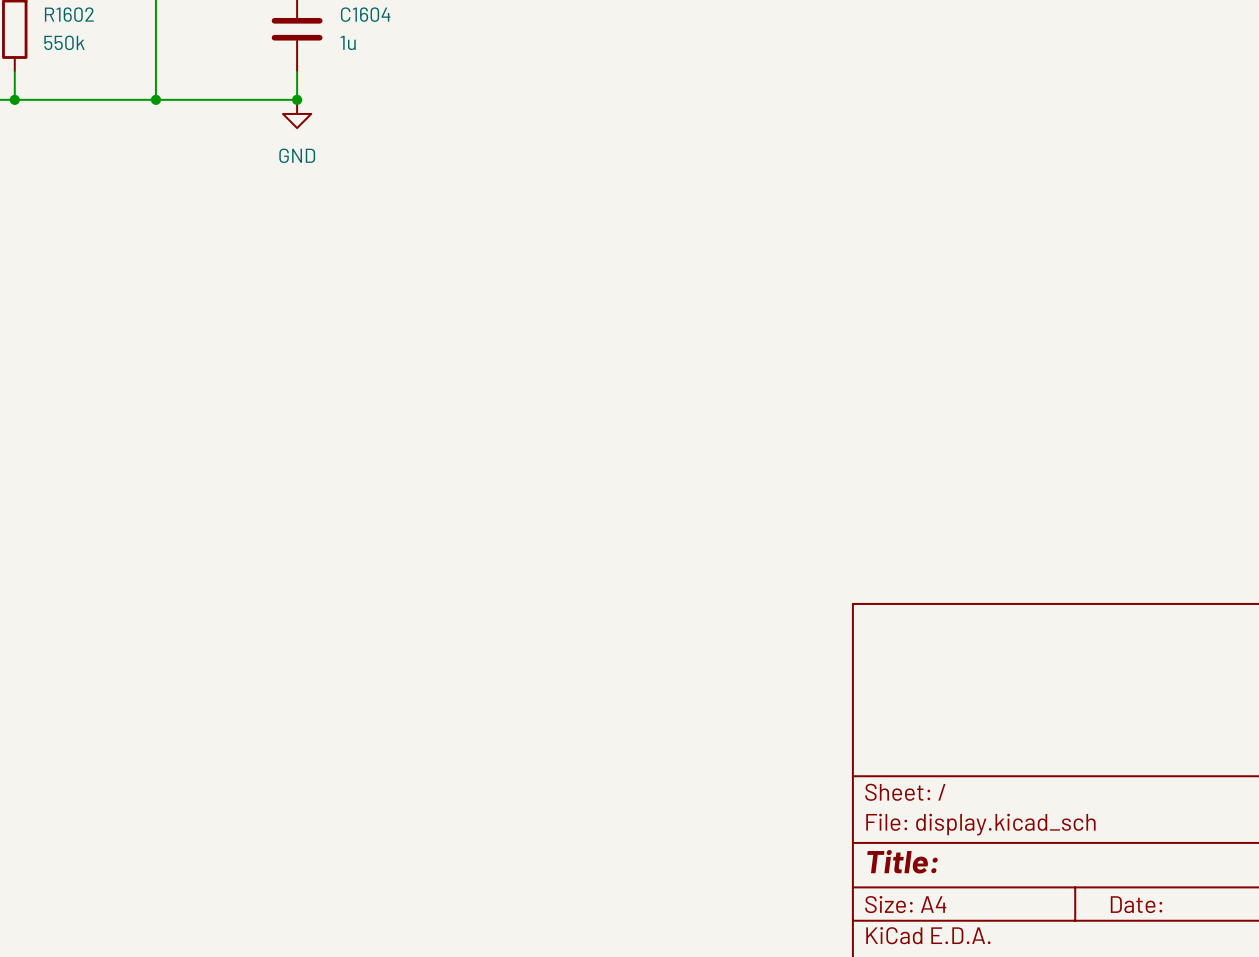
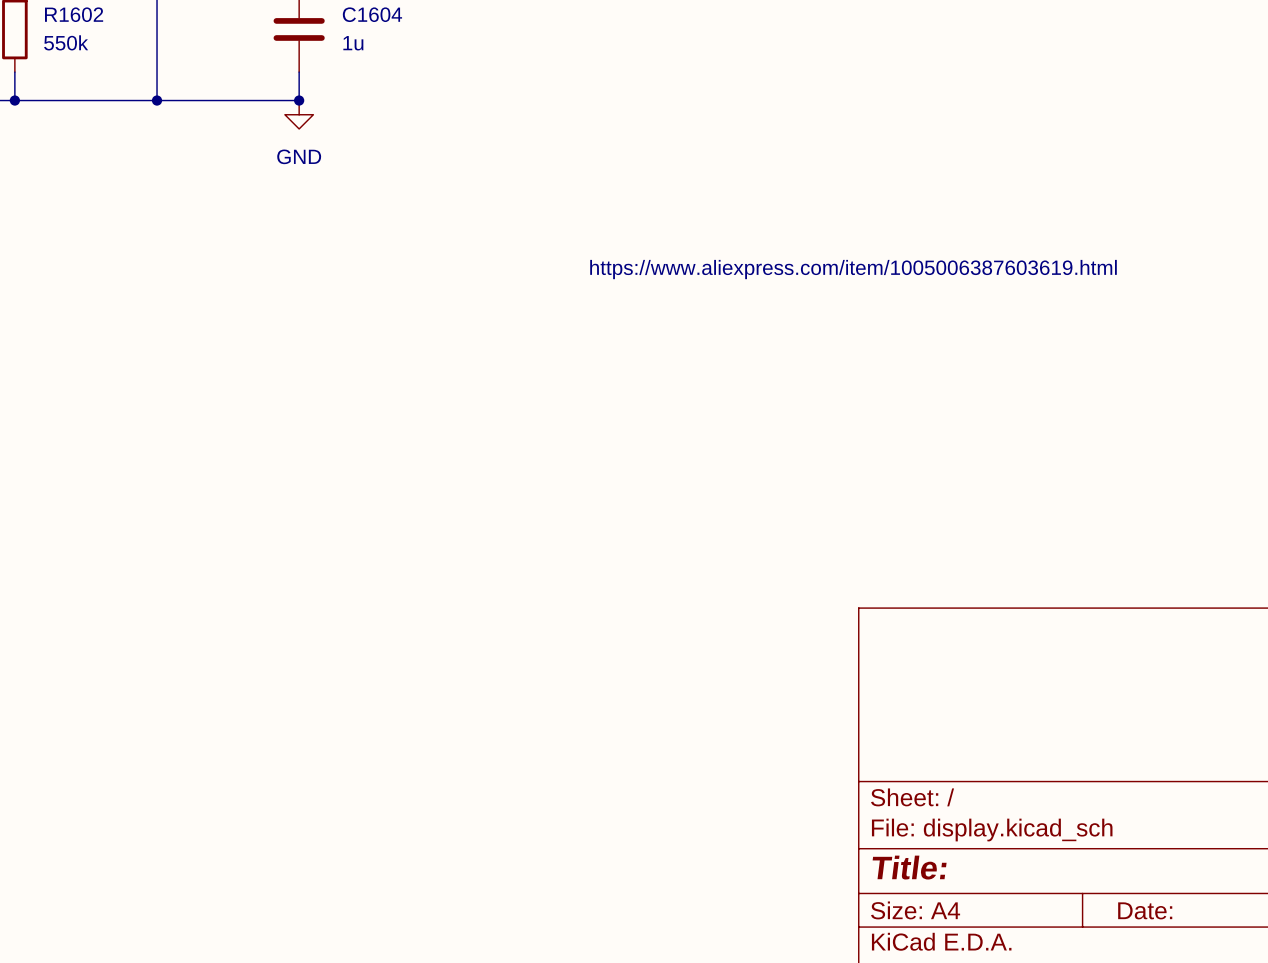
text: none -> https://www.aliexpress.com/item/1005006387603619.html (853, 269)

